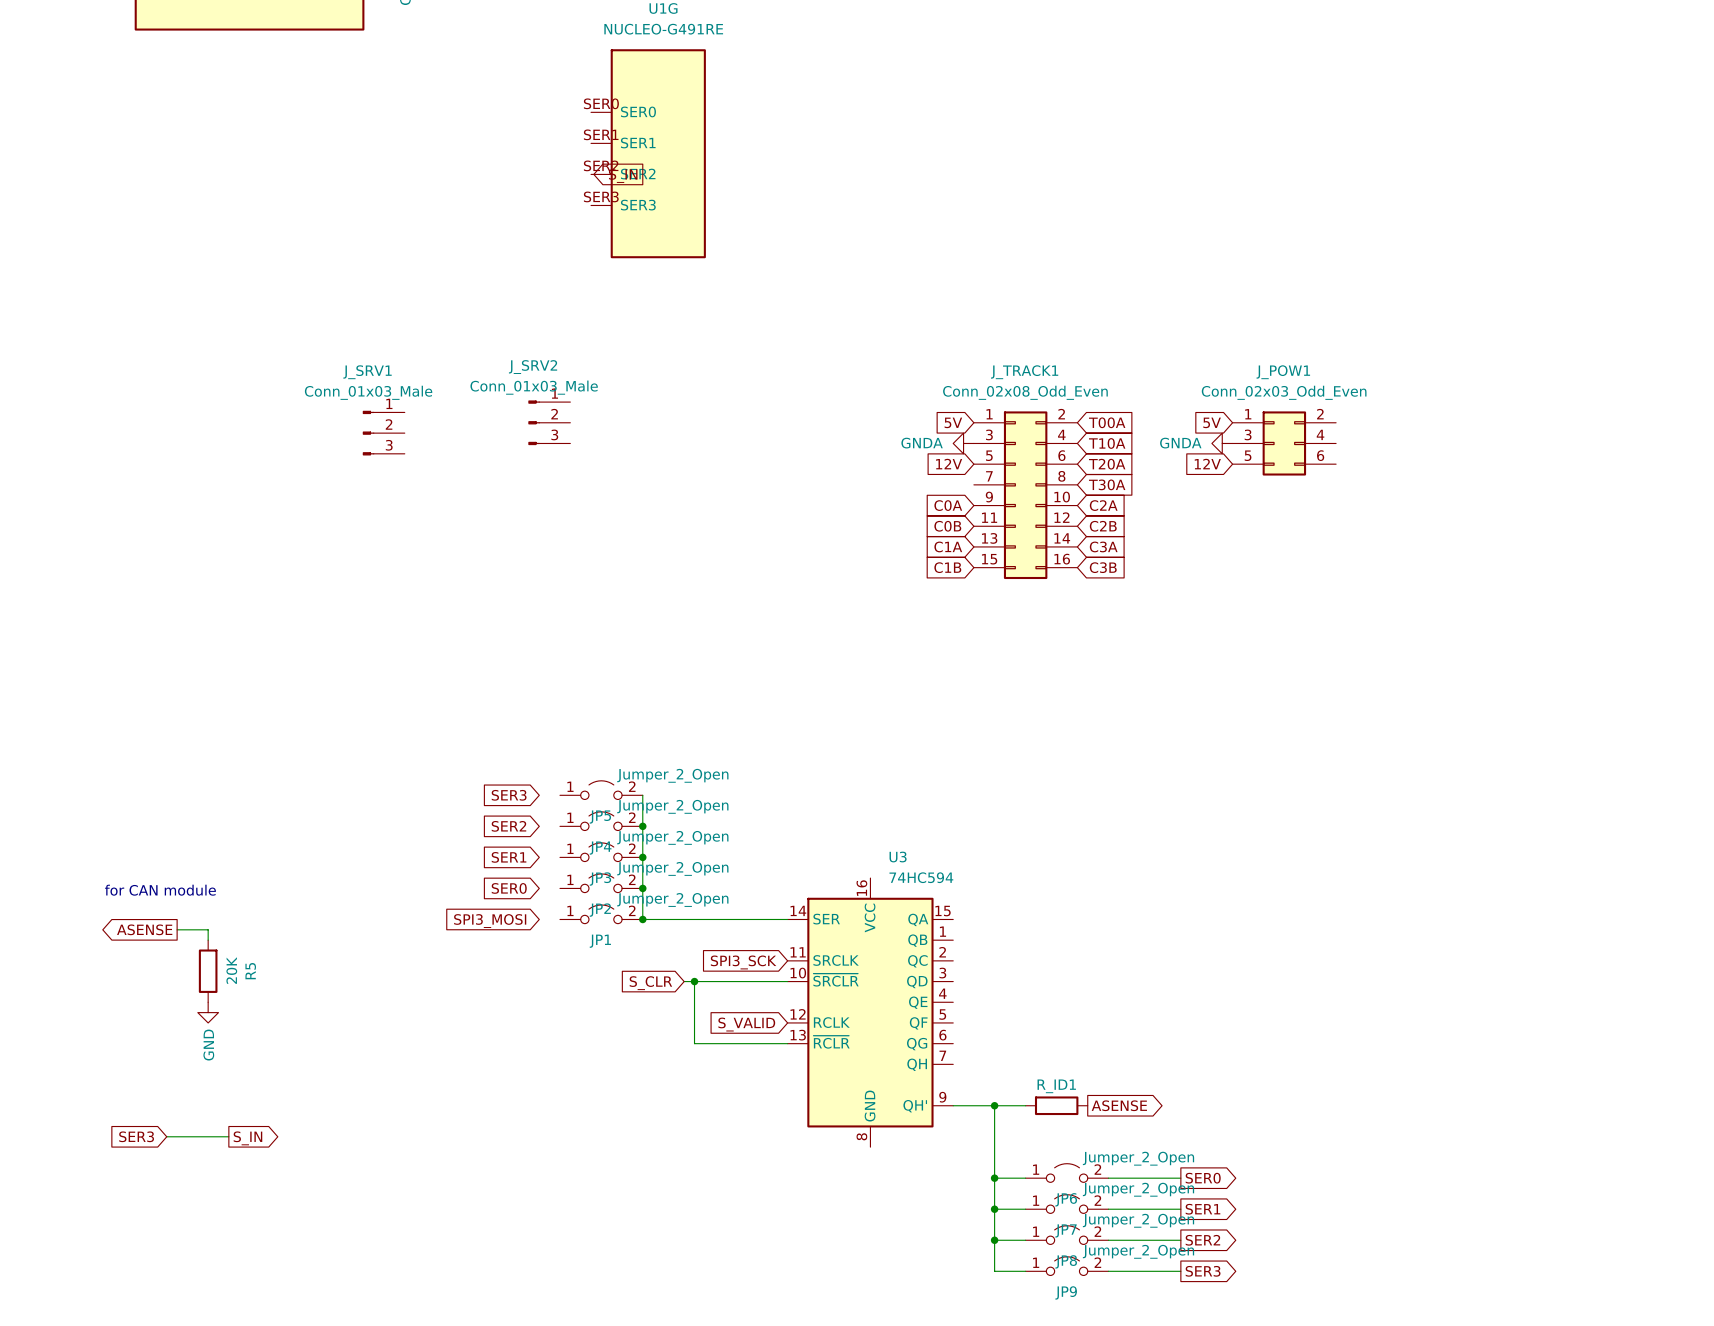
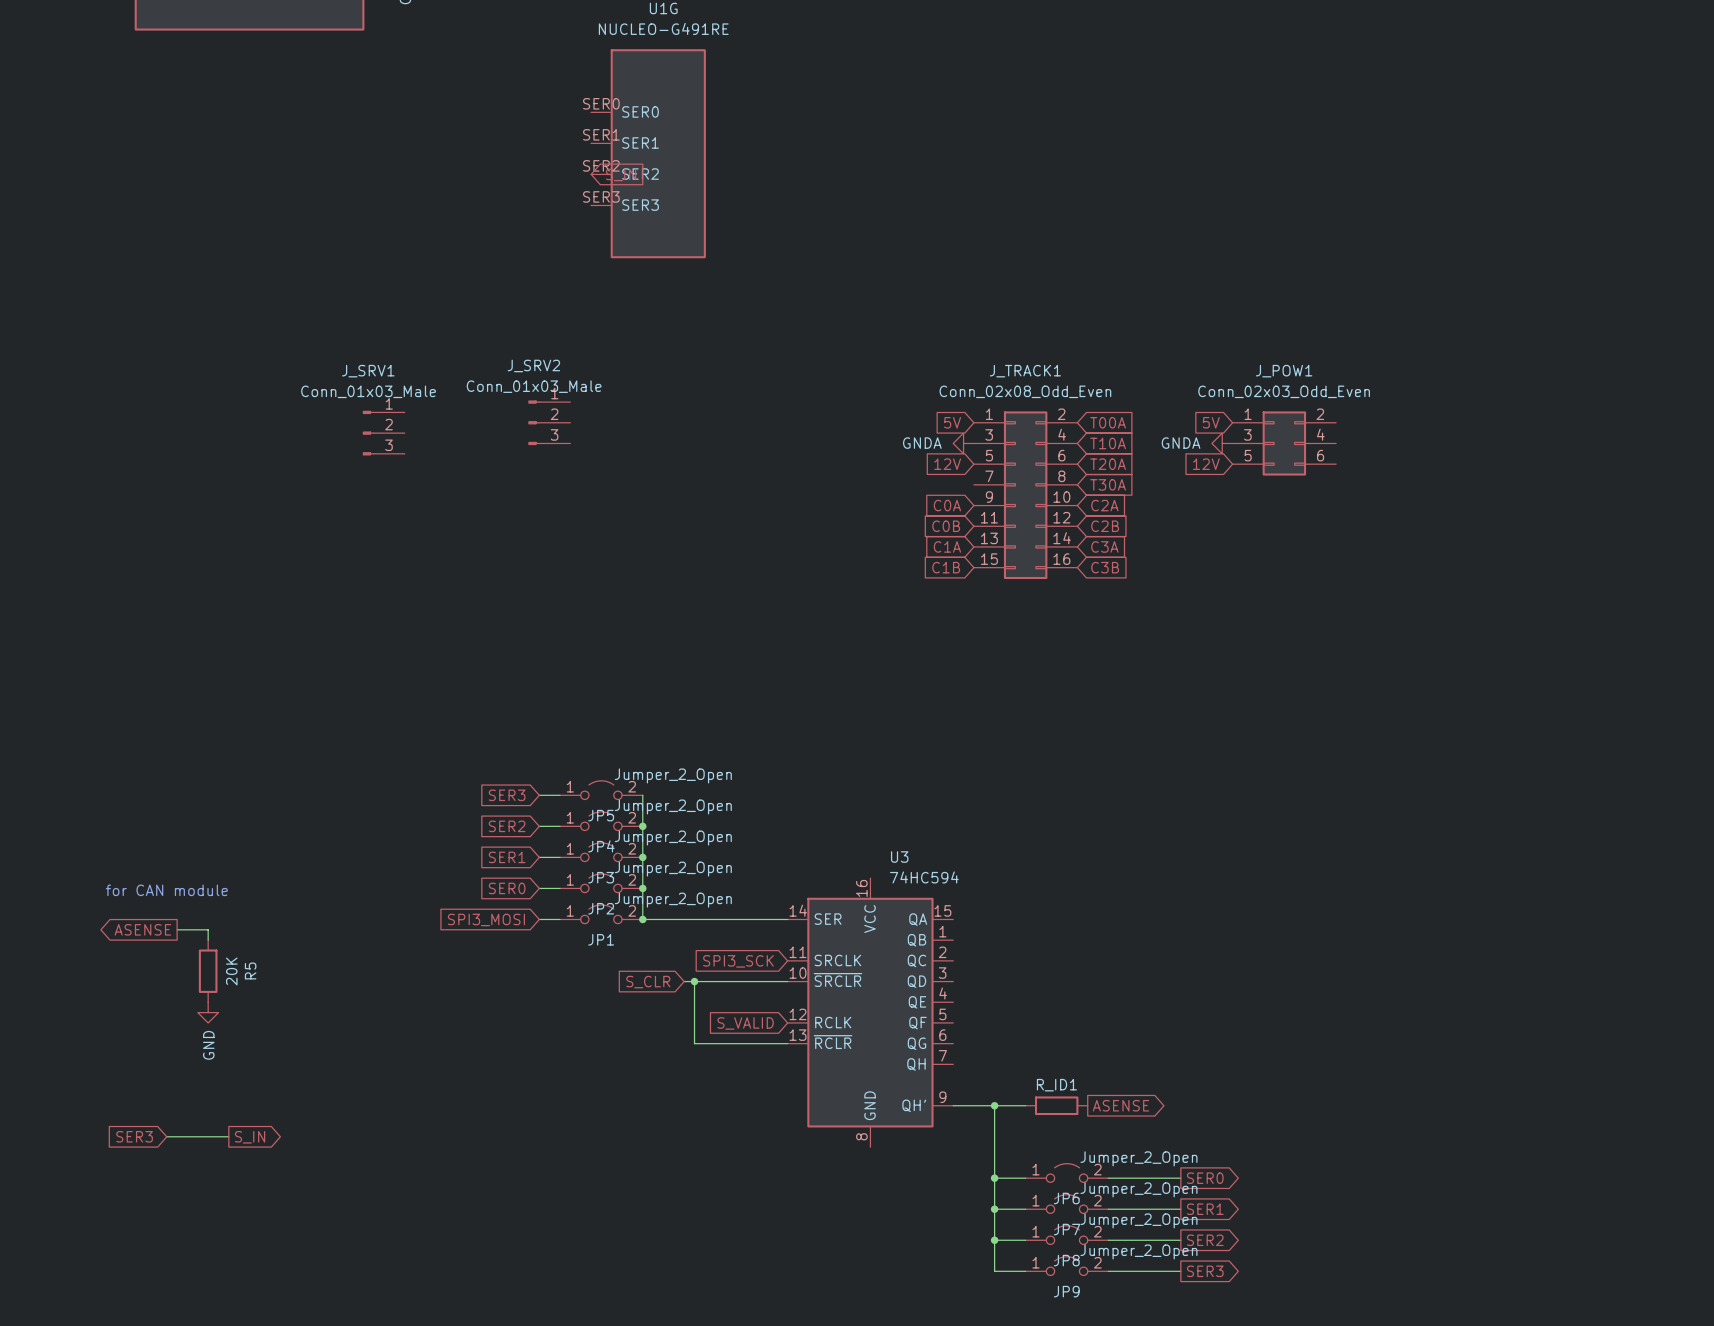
wire: none -> (539, 795) (559, 795)
wire: none -> (539, 826) (559, 826)
wire: none -> (539, 857) (559, 857)
wire: none -> (539, 888) (559, 888)
wire: none -> (539, 919) (559, 919)

